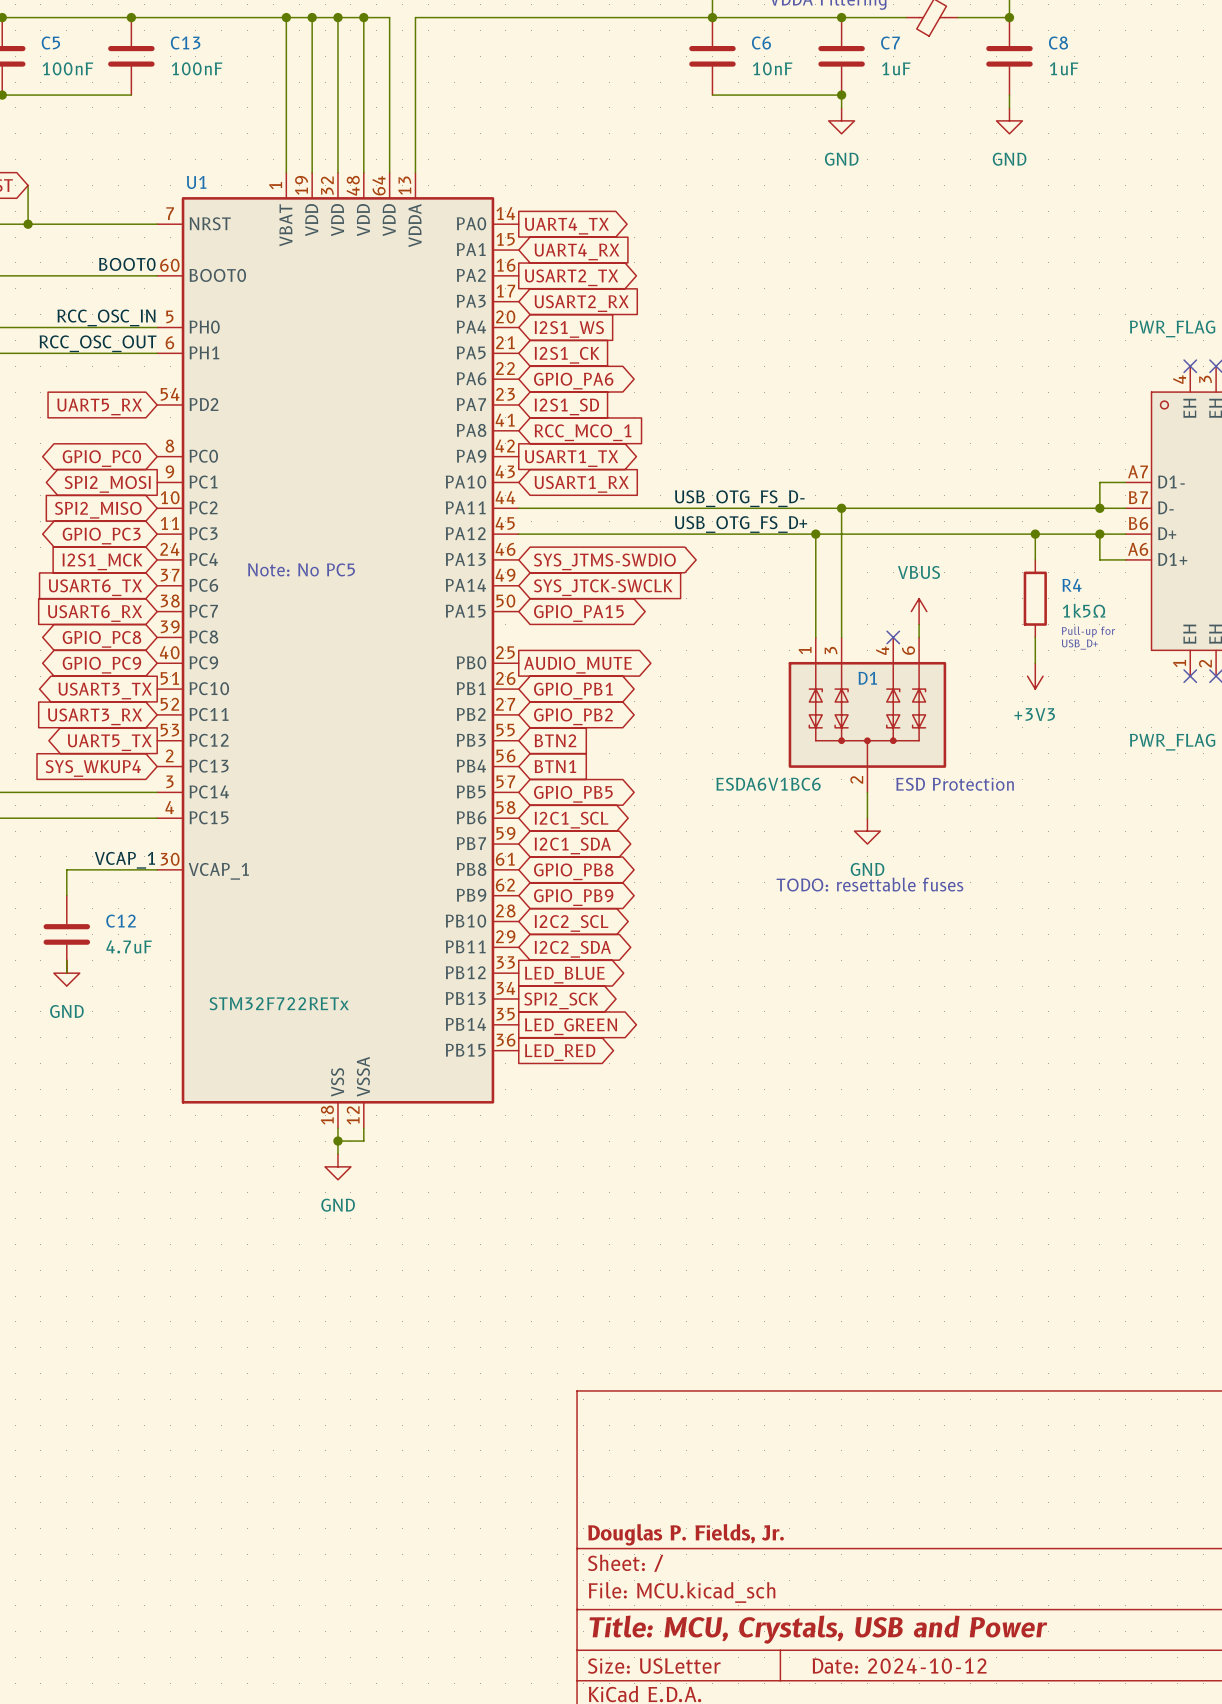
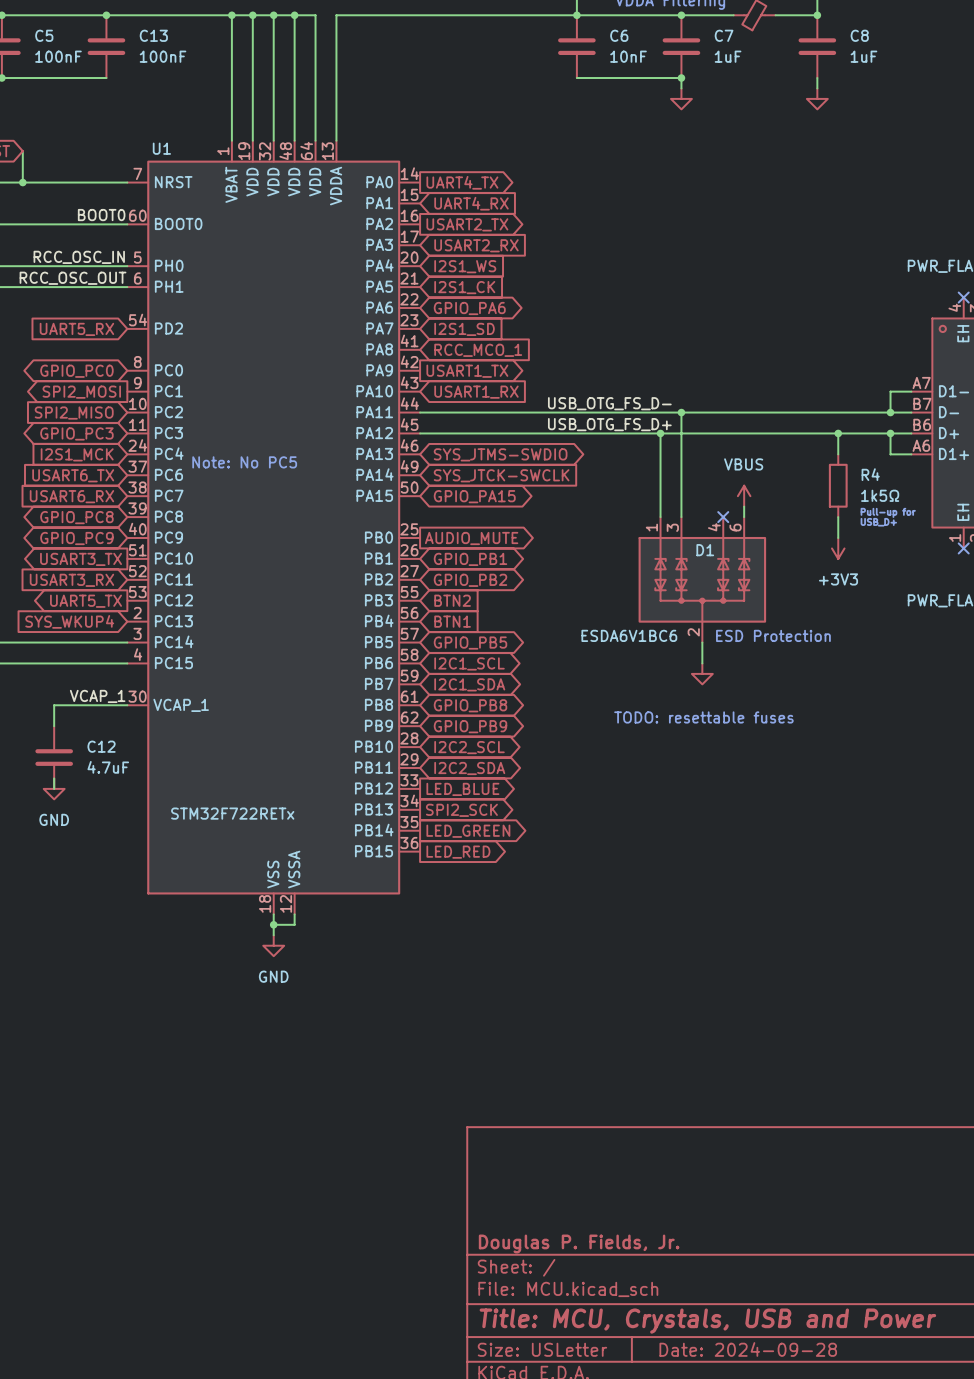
power symbol text: GND (841, 159) -> none
power symbol text: GND (1009, 159) -> none
power symbol text: GND (867, 869) -> none
title block: Date: 2024-10-12 (899, 1666) -> Date: 2024-09-28 (748, 1349)

